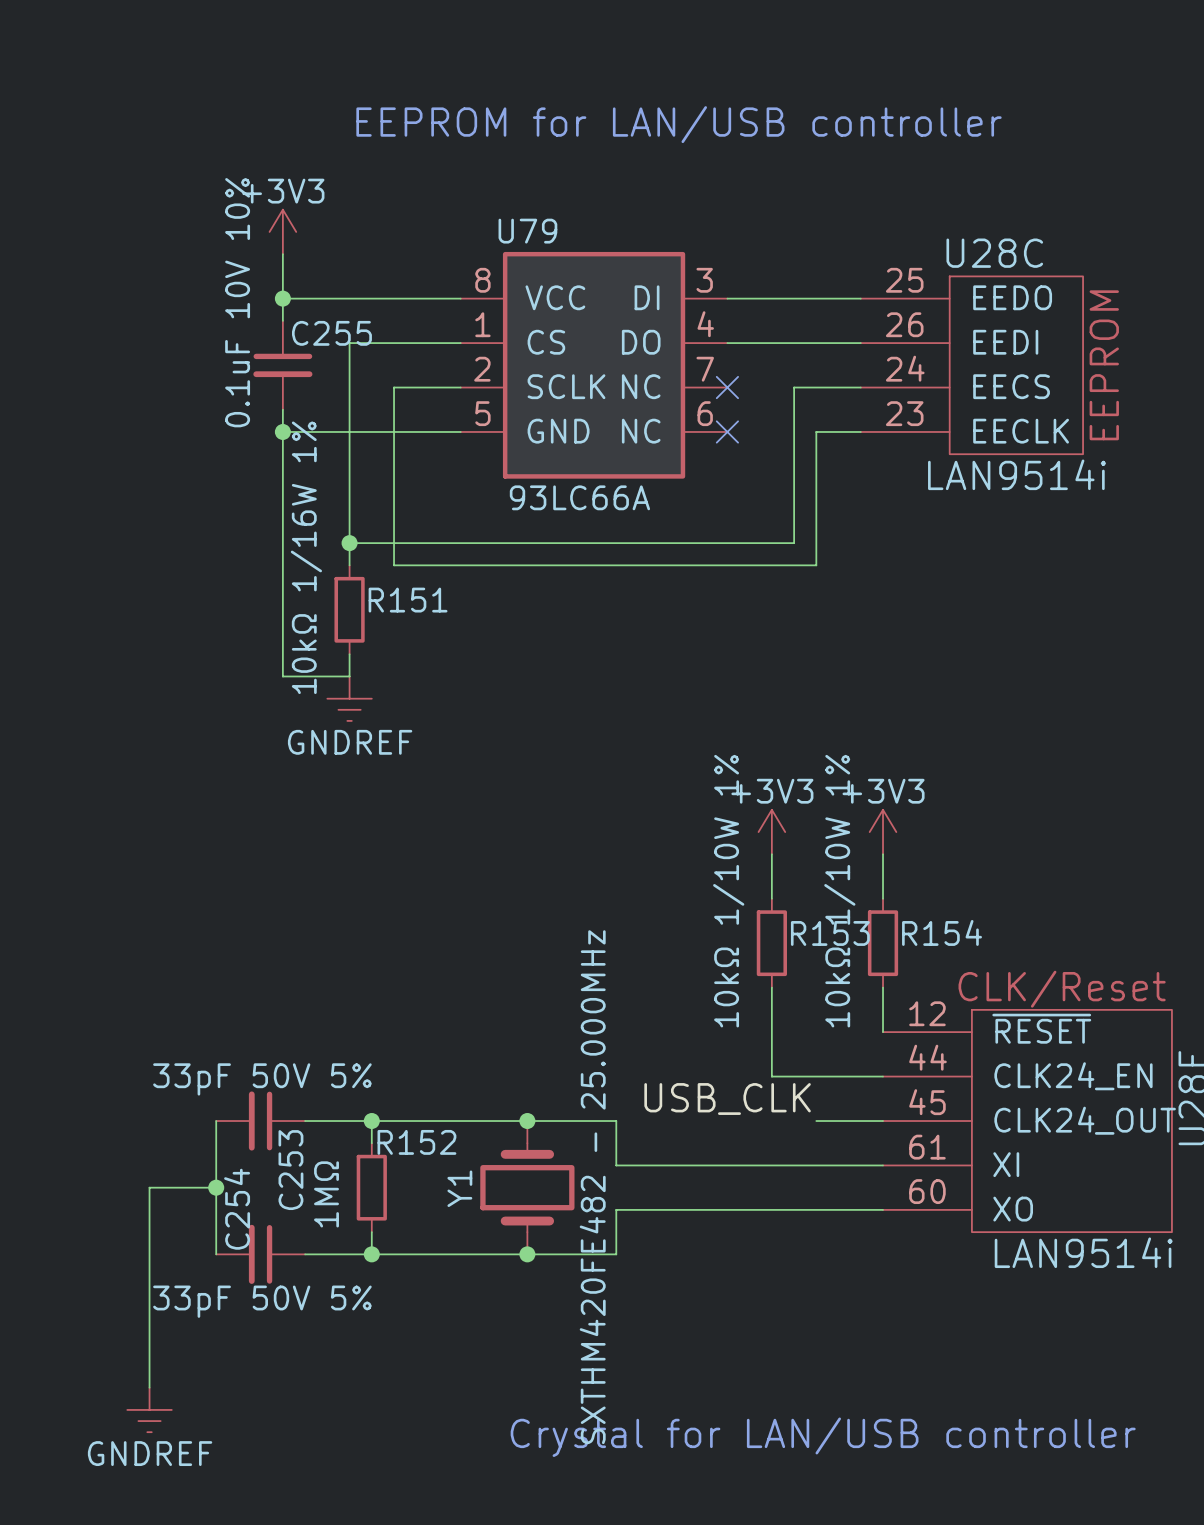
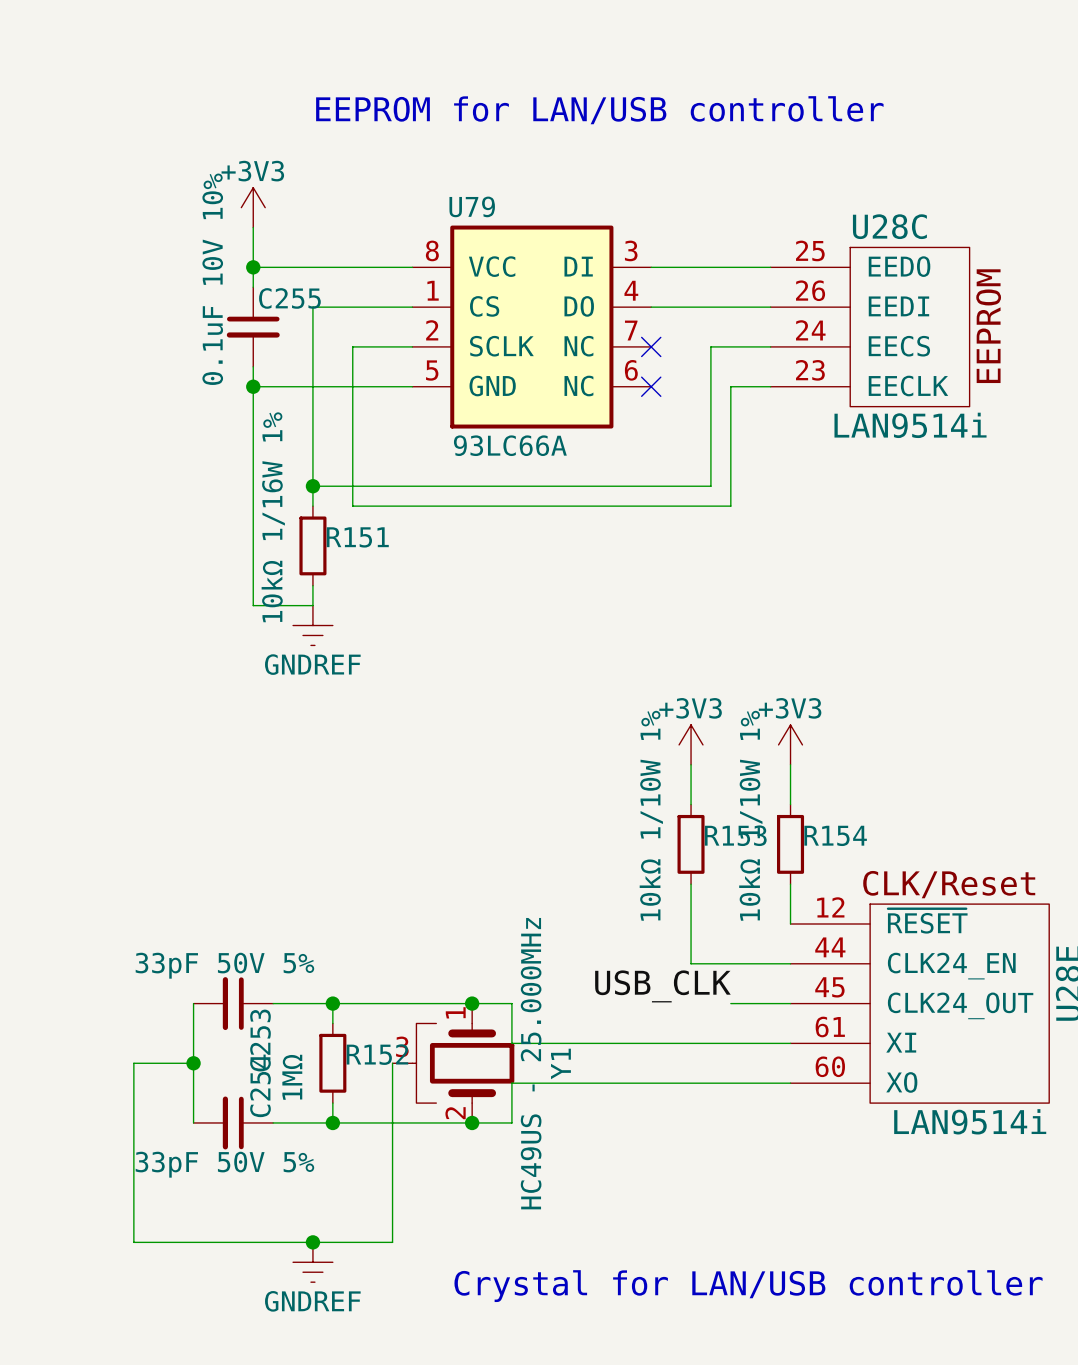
Y1 symbol: [480, 1121, 575, 1255] -> [392, 1003, 515, 1123]
wire: (571, 1121) (616, 1121) (616, 1165) -> (511, 1003) (511, 1043) (551, 1043)
R152 name position: R152 (416, 1142) -> R152 (377, 1054)
wire: none -> (392, 1063) (392, 1242) (133, 1242)
Y1 value: SXTHM420FE482 - 25.000MHz (592, 1187) -> HC49US - 25.000MHz (531, 1063)
Y1 name position: Y1 (459, 1188) -> Y1 (560, 1063)
C254 name position: C254 (237, 1209) -> C254 (260, 1085)
wire: (616, 1209) (616, 1254) (571, 1254) -> (551, 1083) (511, 1083) (511, 1122)
junction: none -> (312, 1242)
power symbol position: GNDREF (149, 1409) -> GNDREF (312, 1262)

